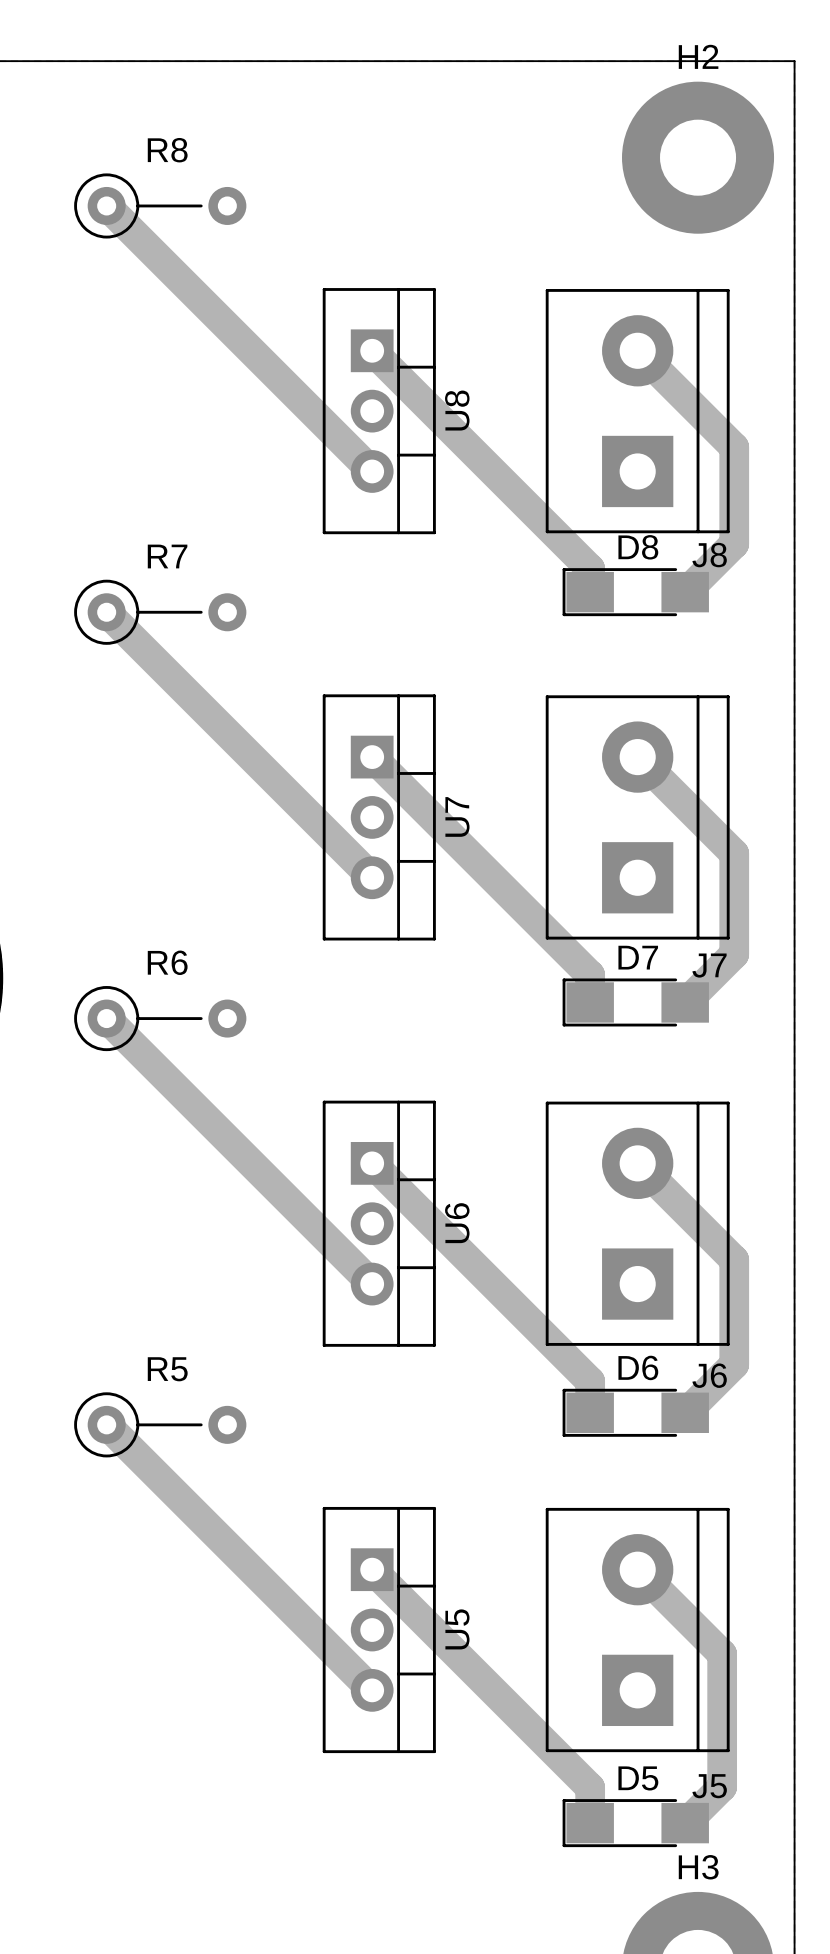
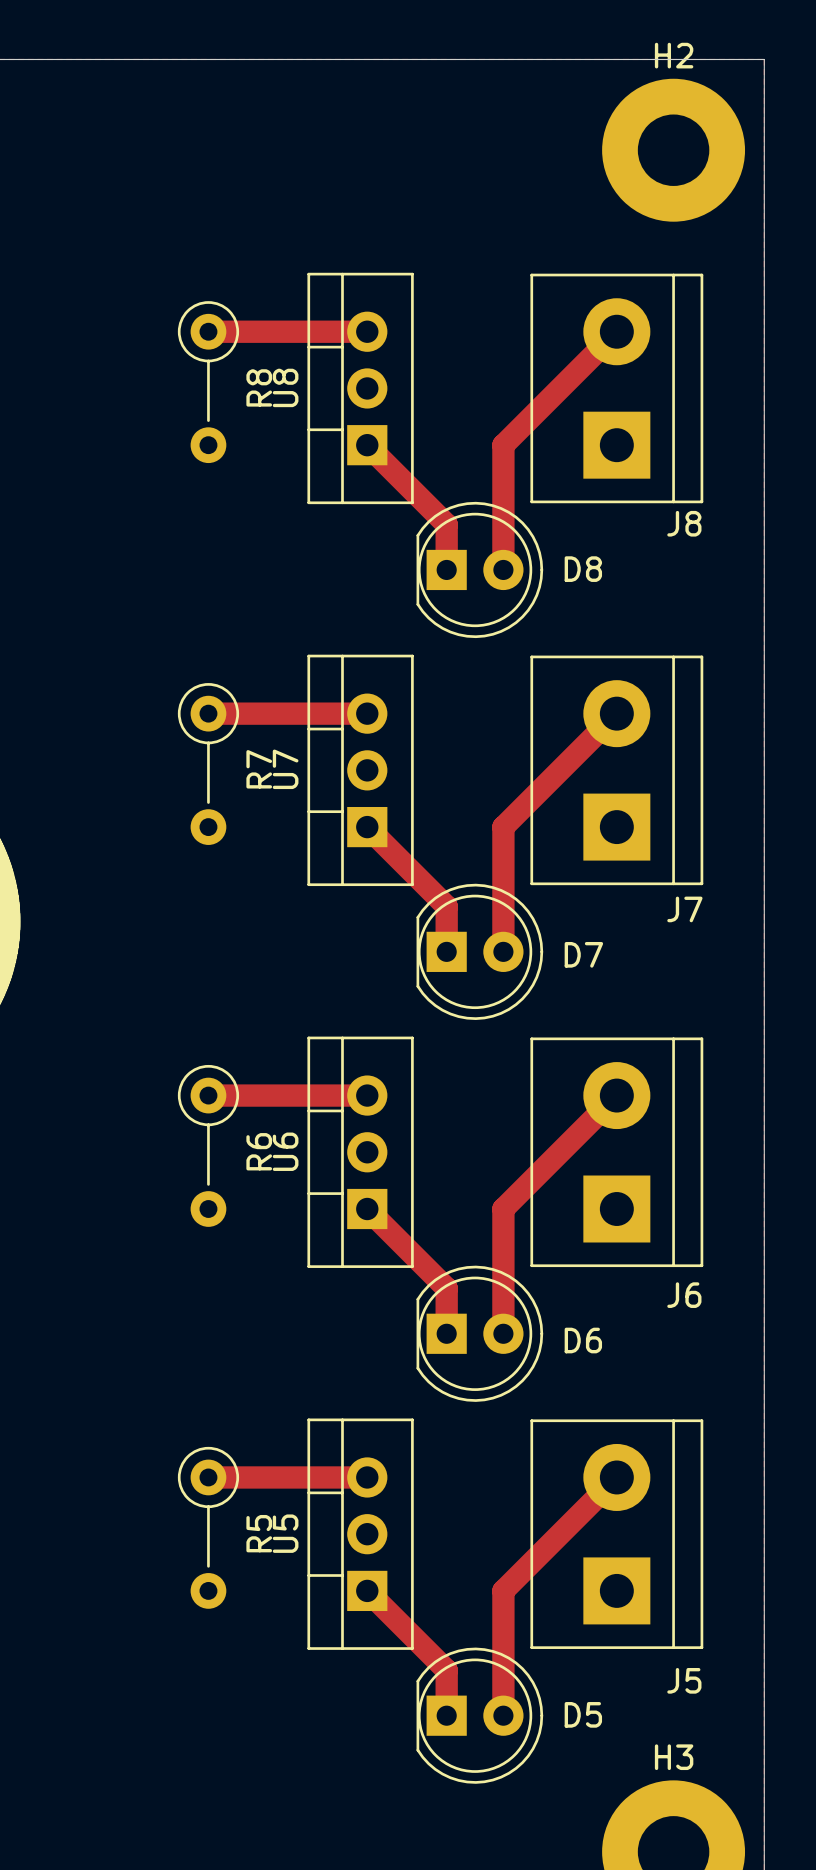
track: (106, 205) (372, 471) -> (446, 569) (446, 524) (367, 445)
R8 rotation: 0° (160, 205) -> 90° clockwise (208, 382)
R8 position: (160, 205) -> (208, 382)
track: (372, 350) (590, 568) (590, 592) -> (367, 331) (208, 331)
track: (637, 350) (734, 447) (734, 543) (685, 592) -> (616, 331) (503, 445) (503, 569)
U8 rotation: 0° (379, 411) -> 180° (360, 388)
D8 name position: D8 (638, 547) -> D8 (583, 569)
D8 footprint: [562, 568, 709, 617] -> [416, 501, 544, 639]
track: (106, 612) (372, 877) -> (446, 951) (446, 906) (367, 827)
R7 rotation: 0° (160, 612) -> 90° clockwise (208, 764)
R7 position: (160, 612) -> (208, 764)
track: (372, 757) (590, 975) (590, 1002) -> (367, 713) (208, 713)
track: (637, 757) (734, 853) (734, 954) (685, 1002) -> (616, 713) (503, 827) (503, 951)
U7 rotation: 0° (379, 817) -> 180° (360, 770)
D7 name position: D7 (638, 957) -> D7 (583, 954)
D7 footprint: [562, 978, 709, 1027] -> [416, 883, 544, 1020]
track: (106, 1018) (372, 1284) -> (446, 1333) (446, 1288) (367, 1209)
R6 rotation: 0° (160, 1018) -> 90° clockwise (208, 1145)
R6 position: (160, 1018) -> (208, 1145)
track: (372, 1163) (590, 1381) (590, 1412) -> (367, 1095) (208, 1095)
track: (637, 1163) (734, 1259) (734, 1364) (685, 1412) -> (616, 1095) (503, 1209) (503, 1333)
U6 rotation: 0° (379, 1223) -> 180° (360, 1152)
D6 name position: D6 (638, 1367) -> D6 (583, 1340)
D6 footprint: [562, 1388, 709, 1437] -> [416, 1265, 544, 1402]
track: (106, 1424) (372, 1690) -> (446, 1715) (446, 1670) (367, 1590)
R5 rotation: 0° (160, 1424) -> 90° clockwise (208, 1527)
R5 position: (160, 1424) -> (208, 1527)
track: (372, 1569) (590, 1787) (590, 1823) -> (367, 1477) (208, 1477)
track: (637, 1569) (722, 1654) (722, 1786) (685, 1823) -> (616, 1477) (503, 1590) (503, 1715)
U5 rotation: 0° (379, 1630) -> 180° (360, 1534)
D5 name position: D5 (638, 1778) -> D5 (583, 1714)
D5 footprint: [562, 1799, 709, 1848] -> [416, 1647, 544, 1784]

